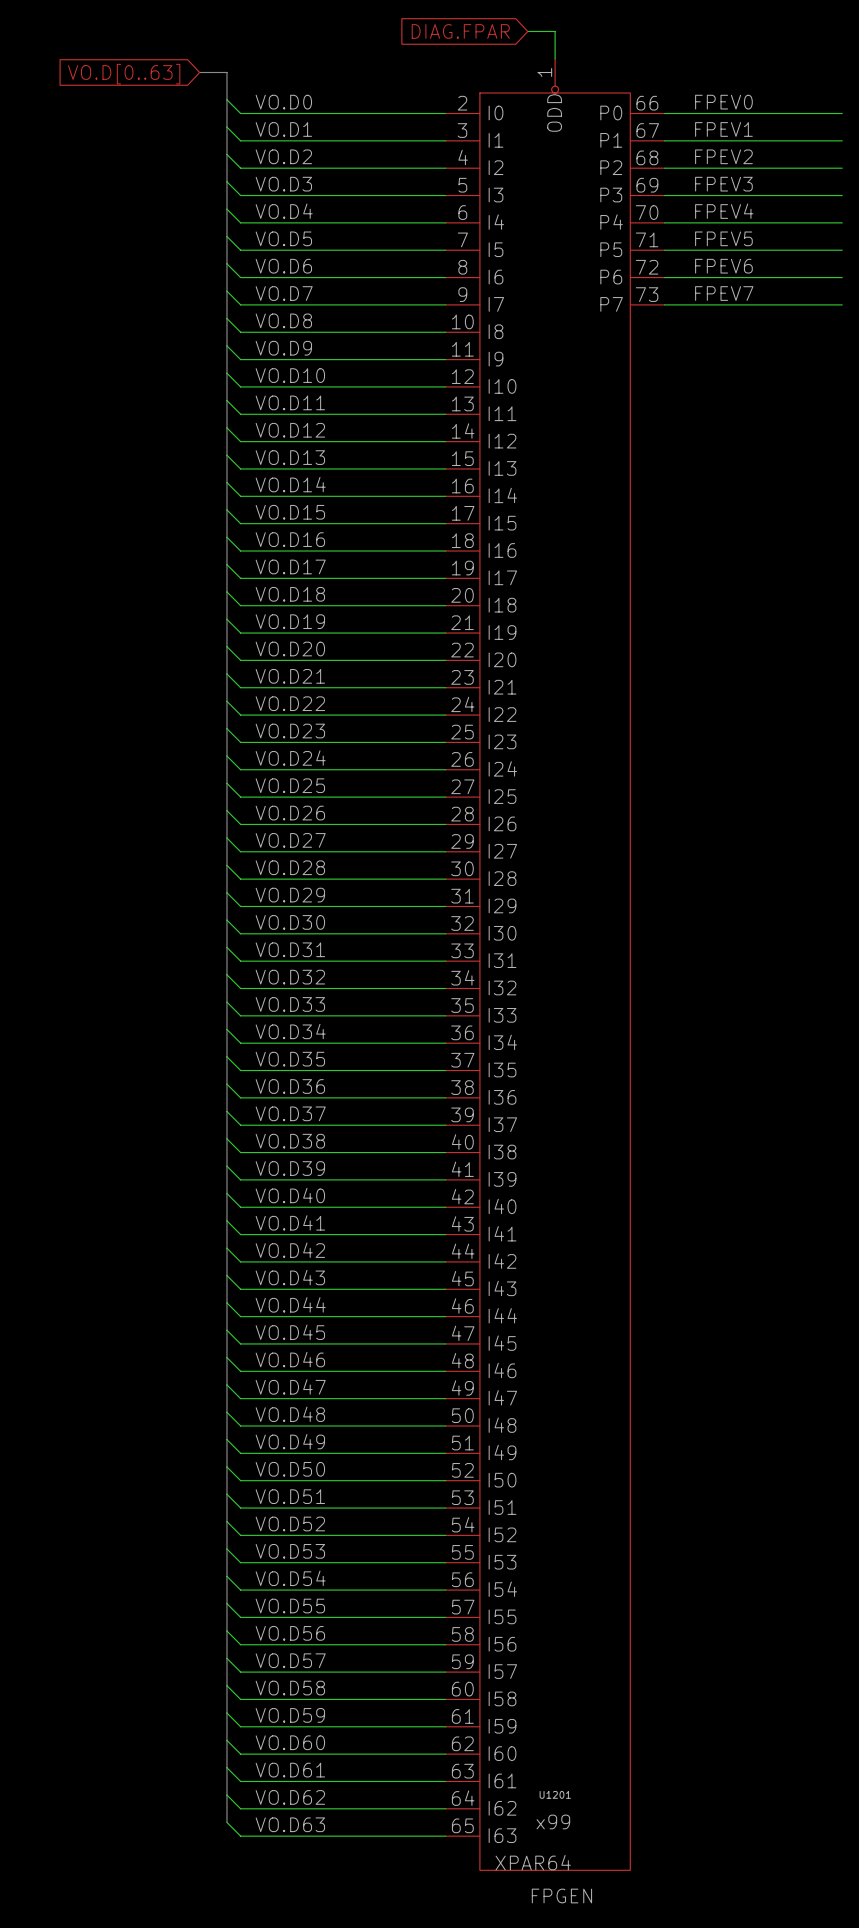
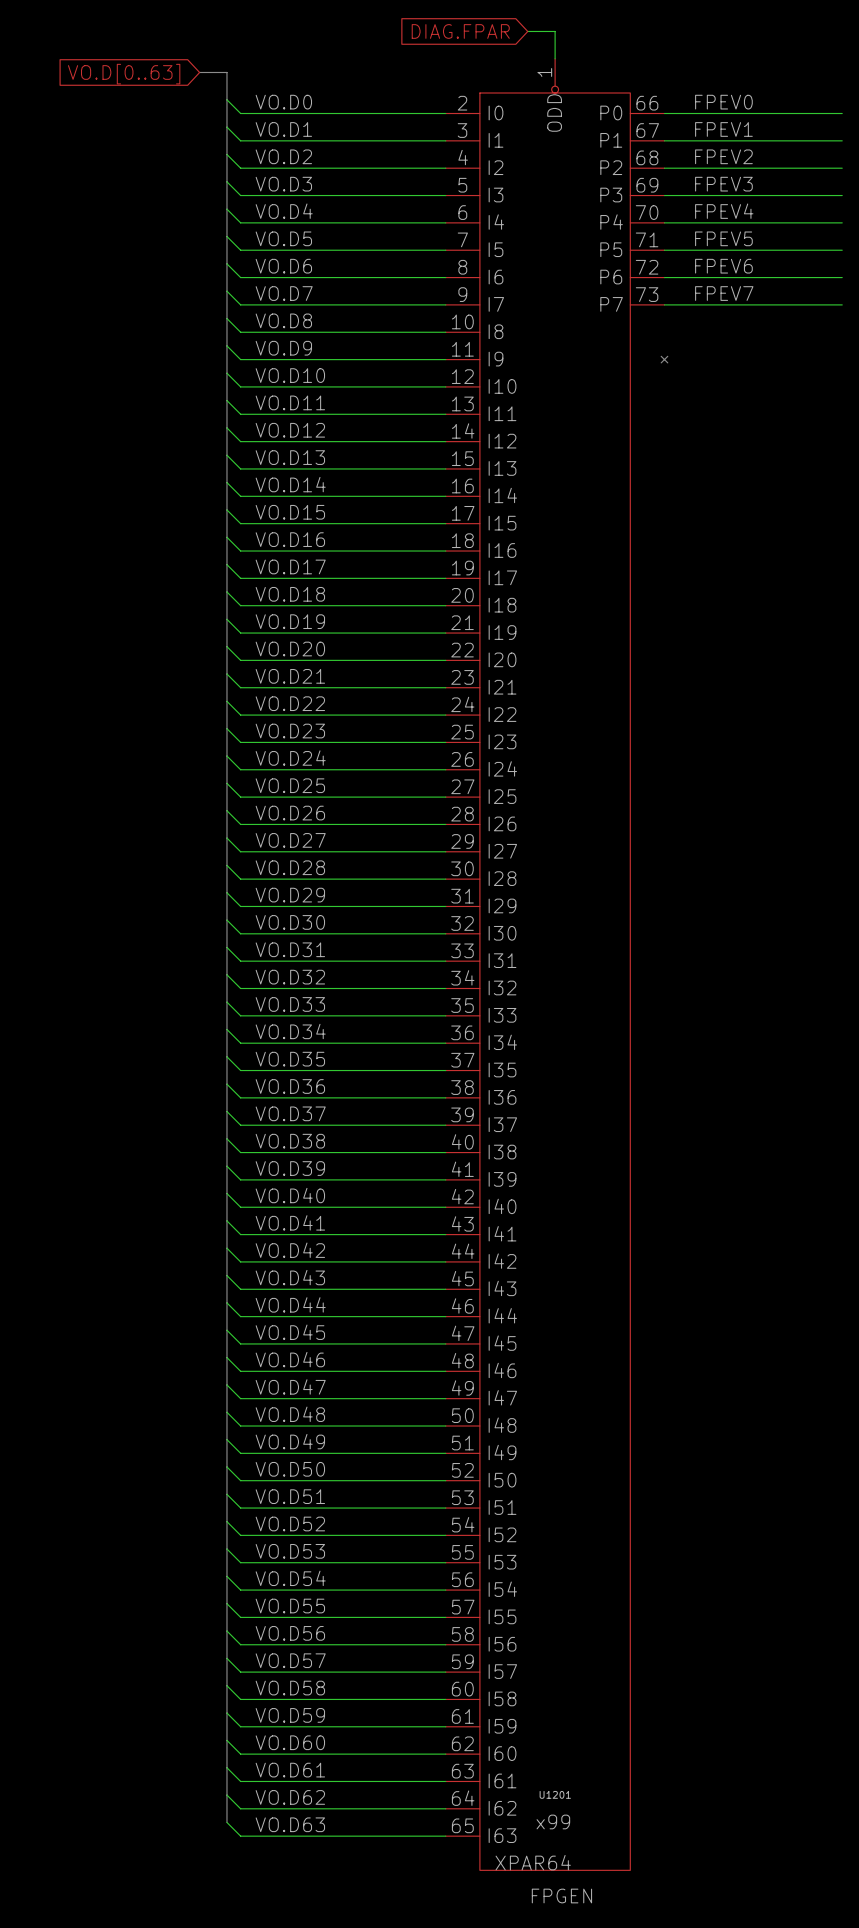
no-connect mark: none -> (664, 359)

